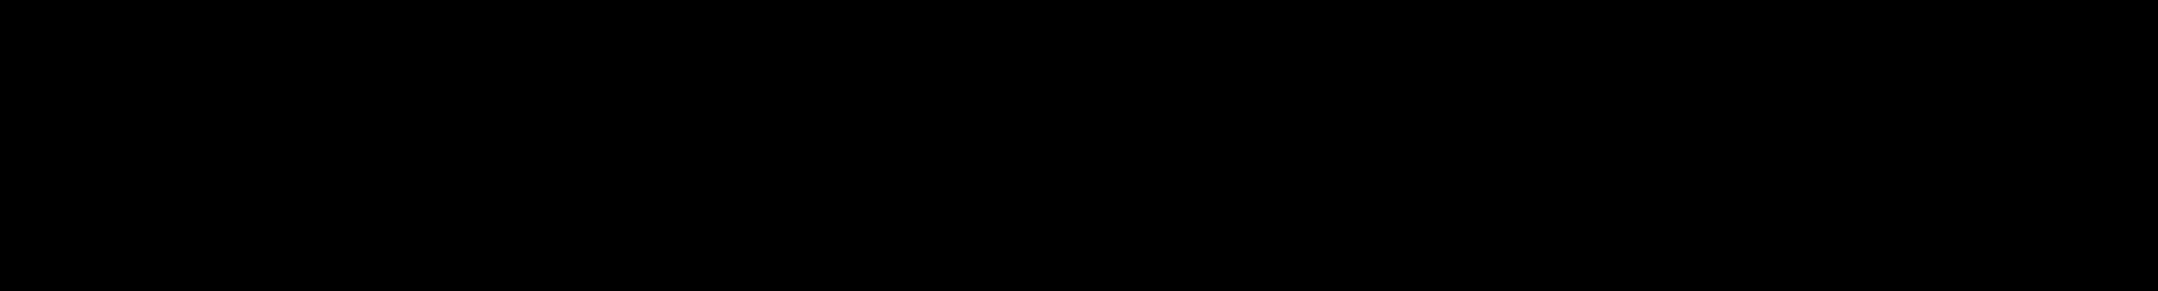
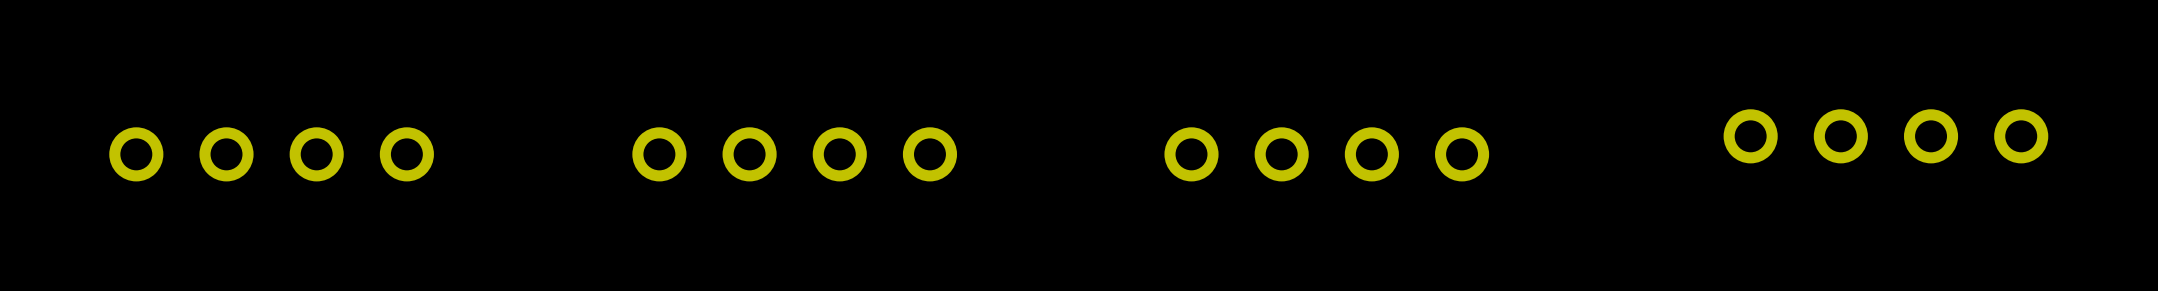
part: none -> (1885, 136)
part: none -> (271, 154)
part: none -> (794, 154)
part: none -> (1326, 154)

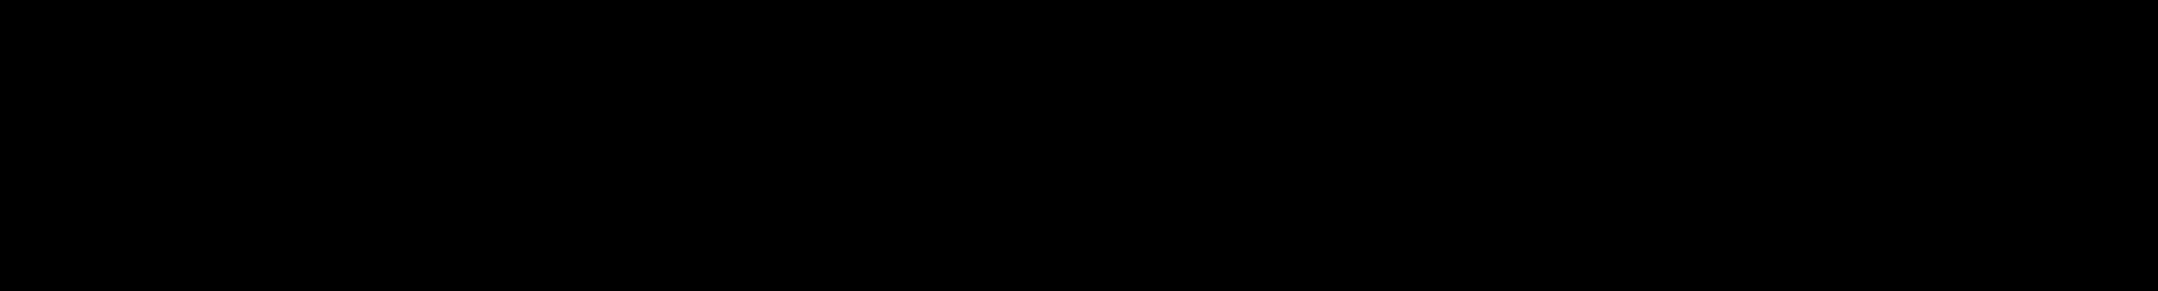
part: (1885, 136) -> none
part: (271, 154) -> none
part: (794, 154) -> none
part: (1326, 154) -> none

